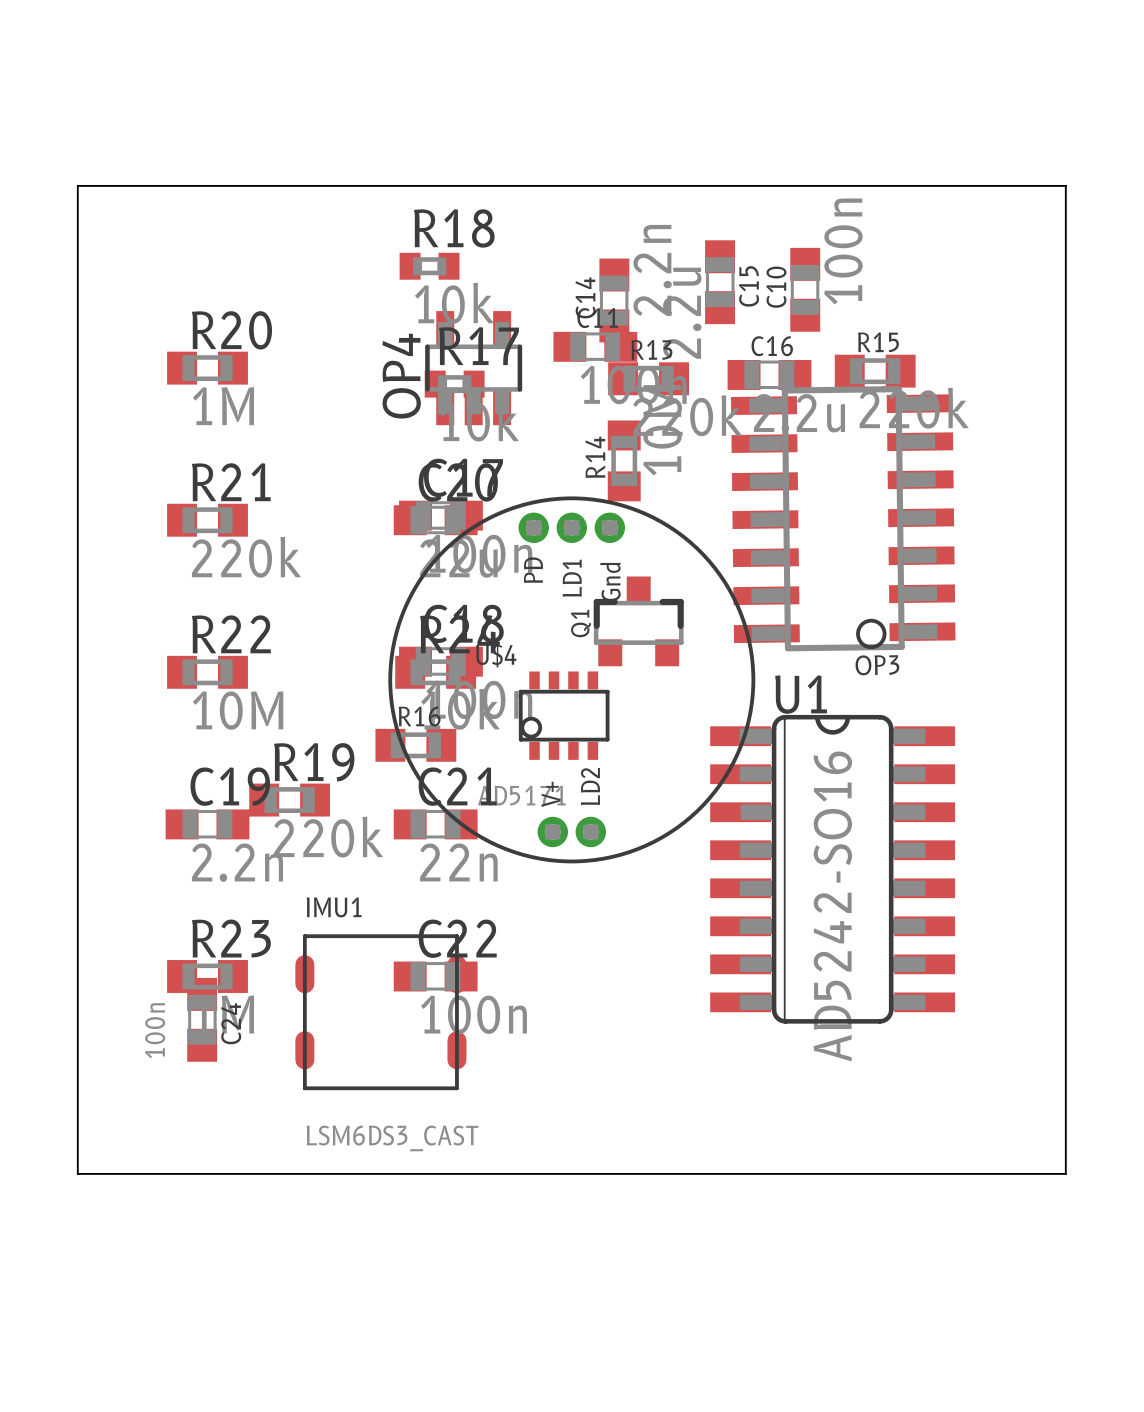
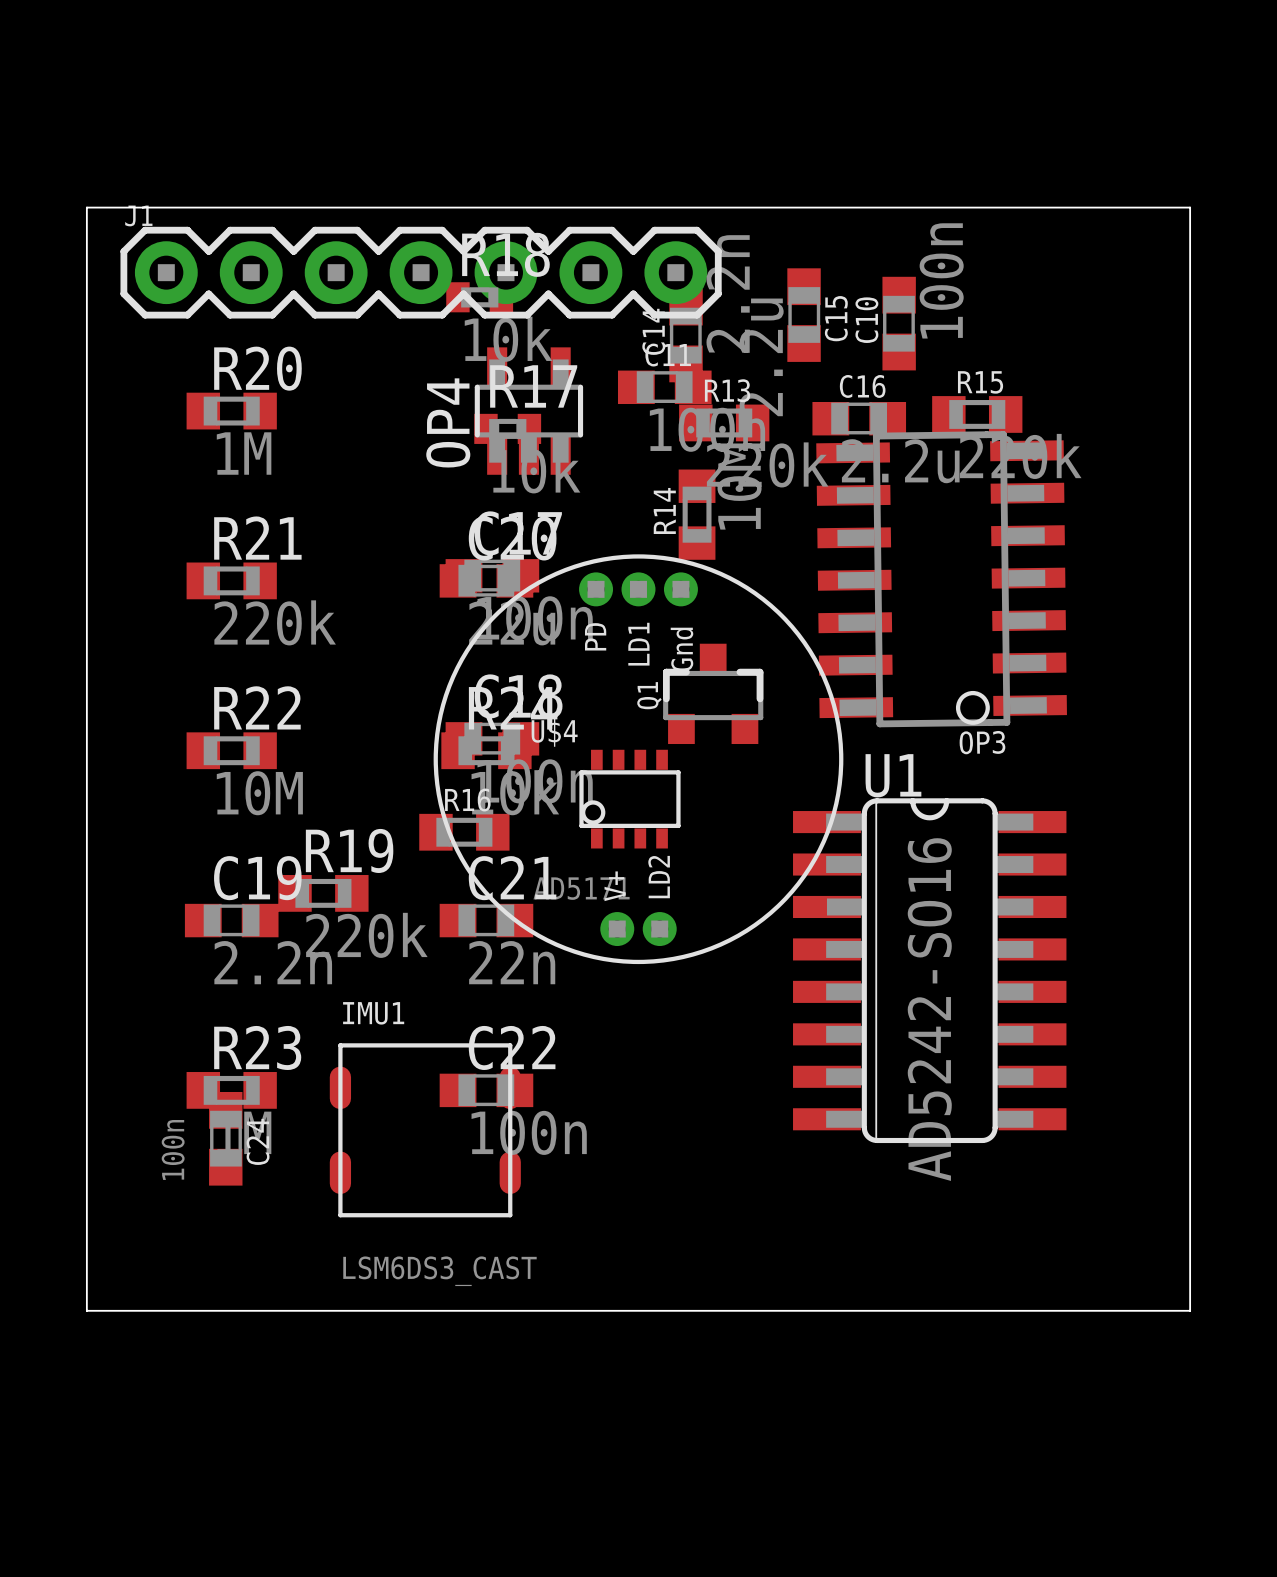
J1: none -> (421, 272)

